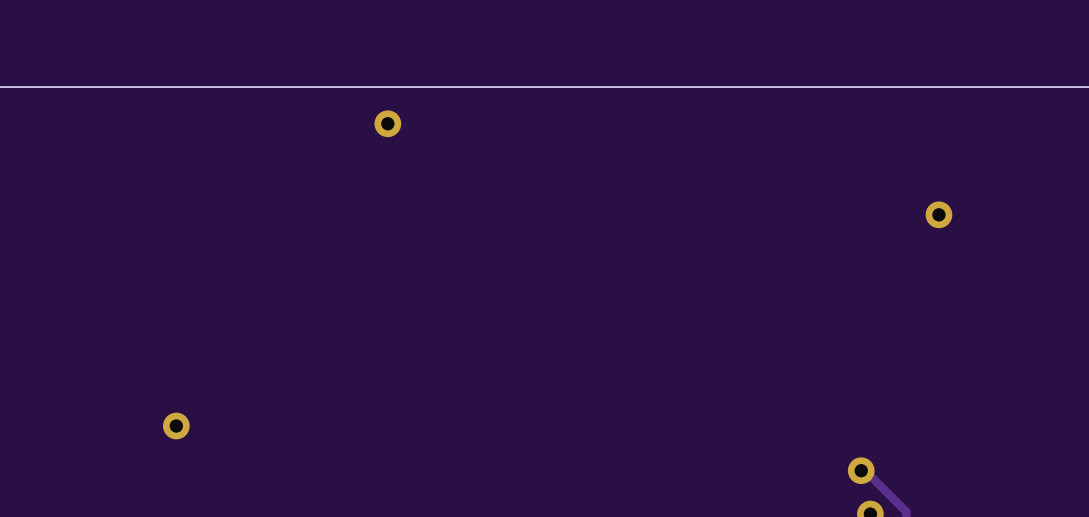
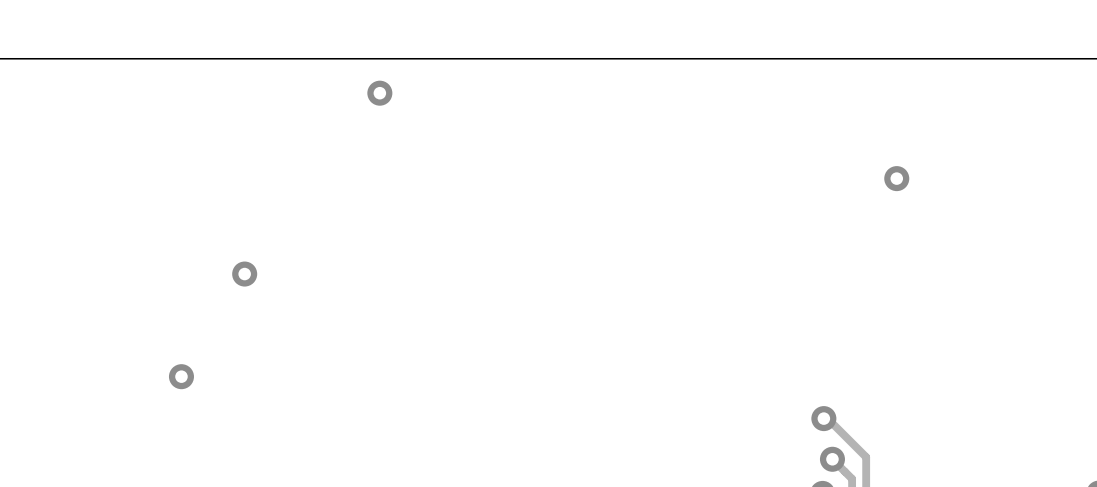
via: none -> (244, 274)

